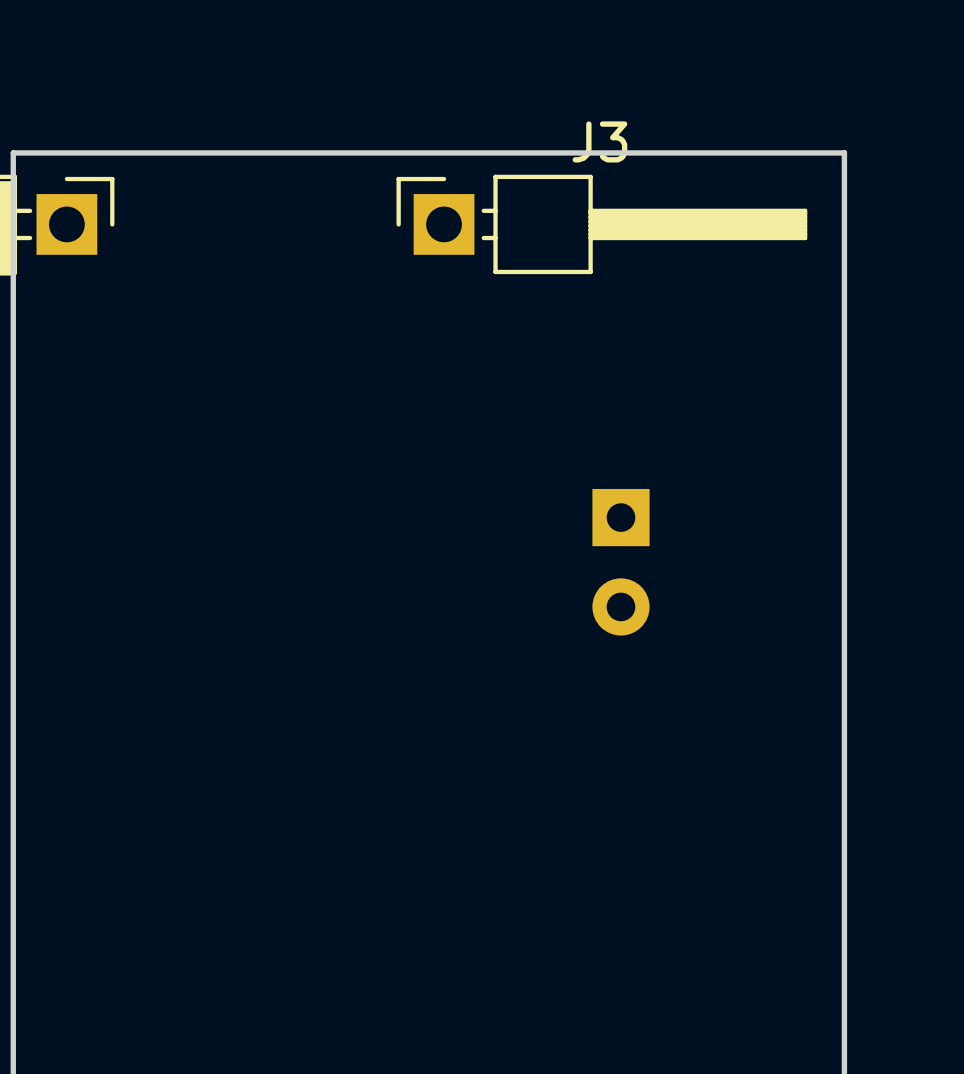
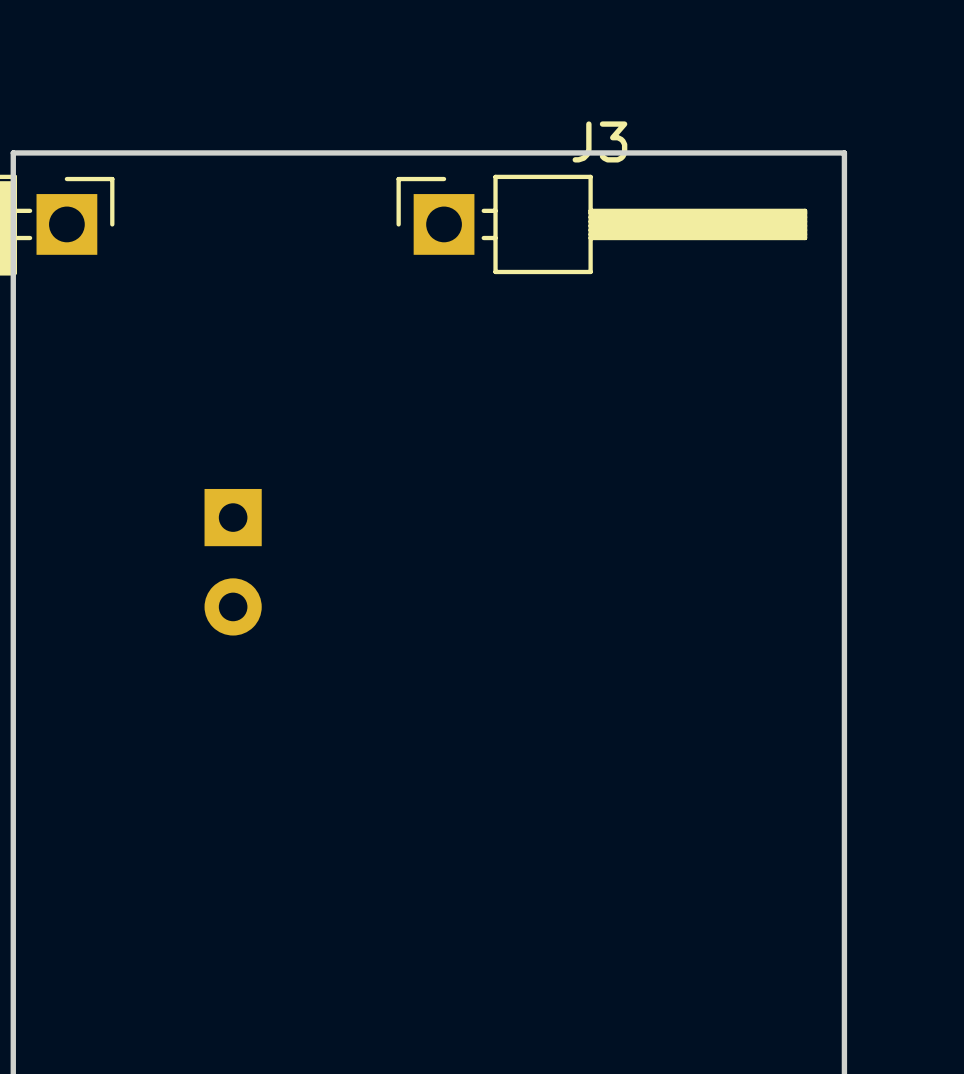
part position: (621, 562) -> (233, 562)

